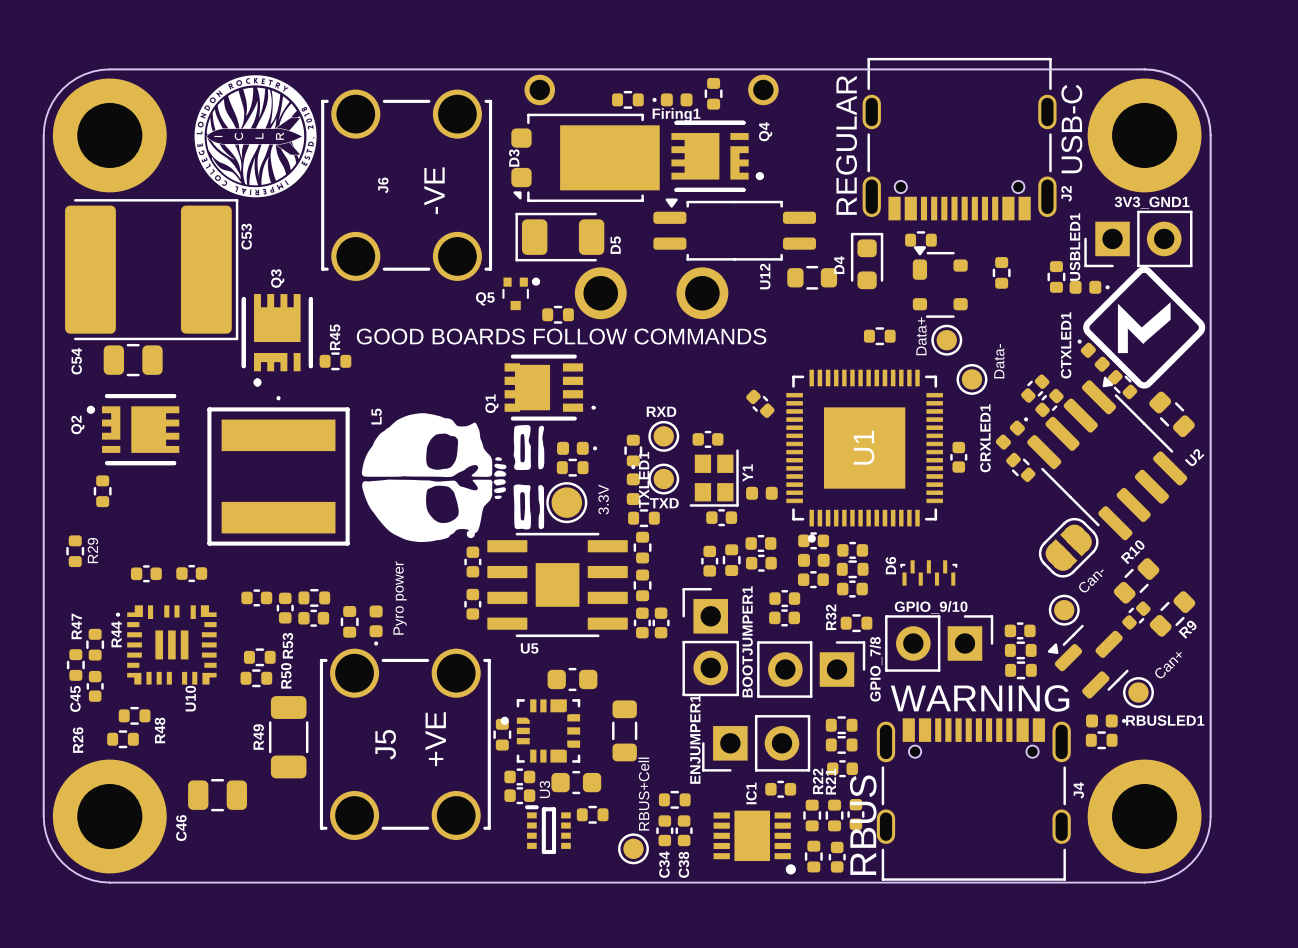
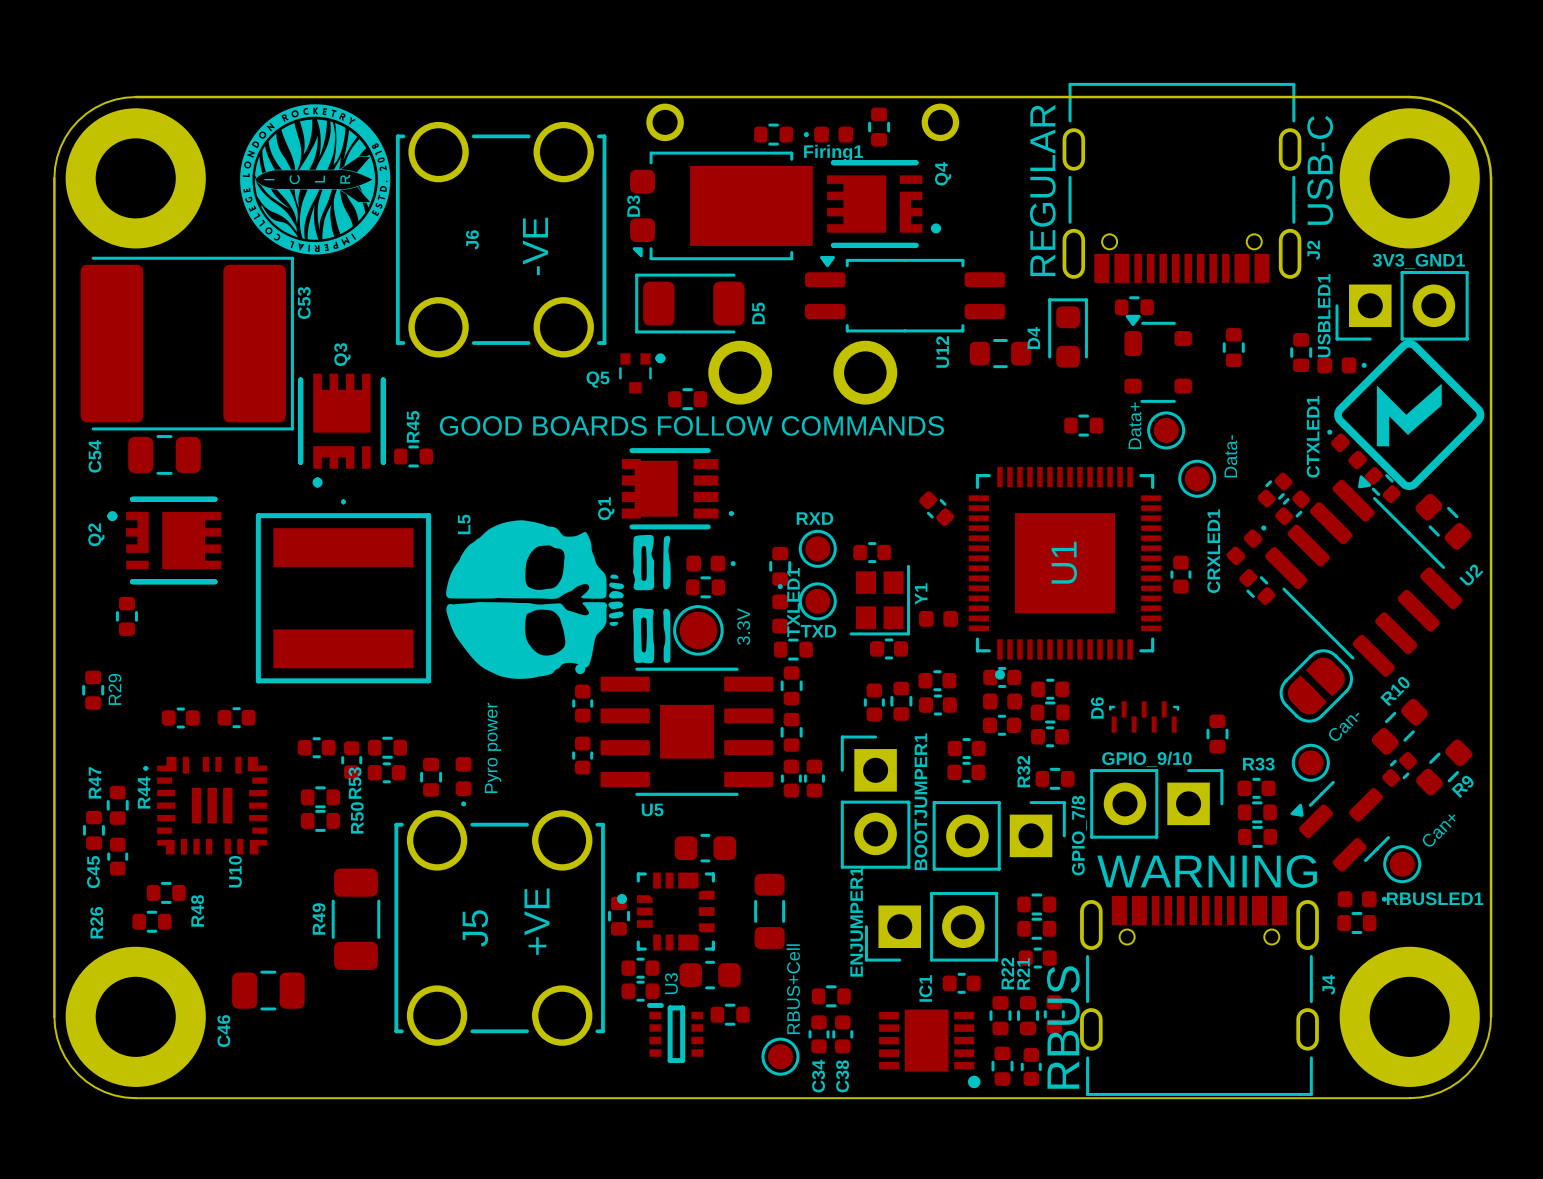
R33: none -> (1217, 734)
R53: none -> (320, 797)
R53 name: R53 (287, 645) -> R50 (357, 817)
R50: (256, 678) -> none

